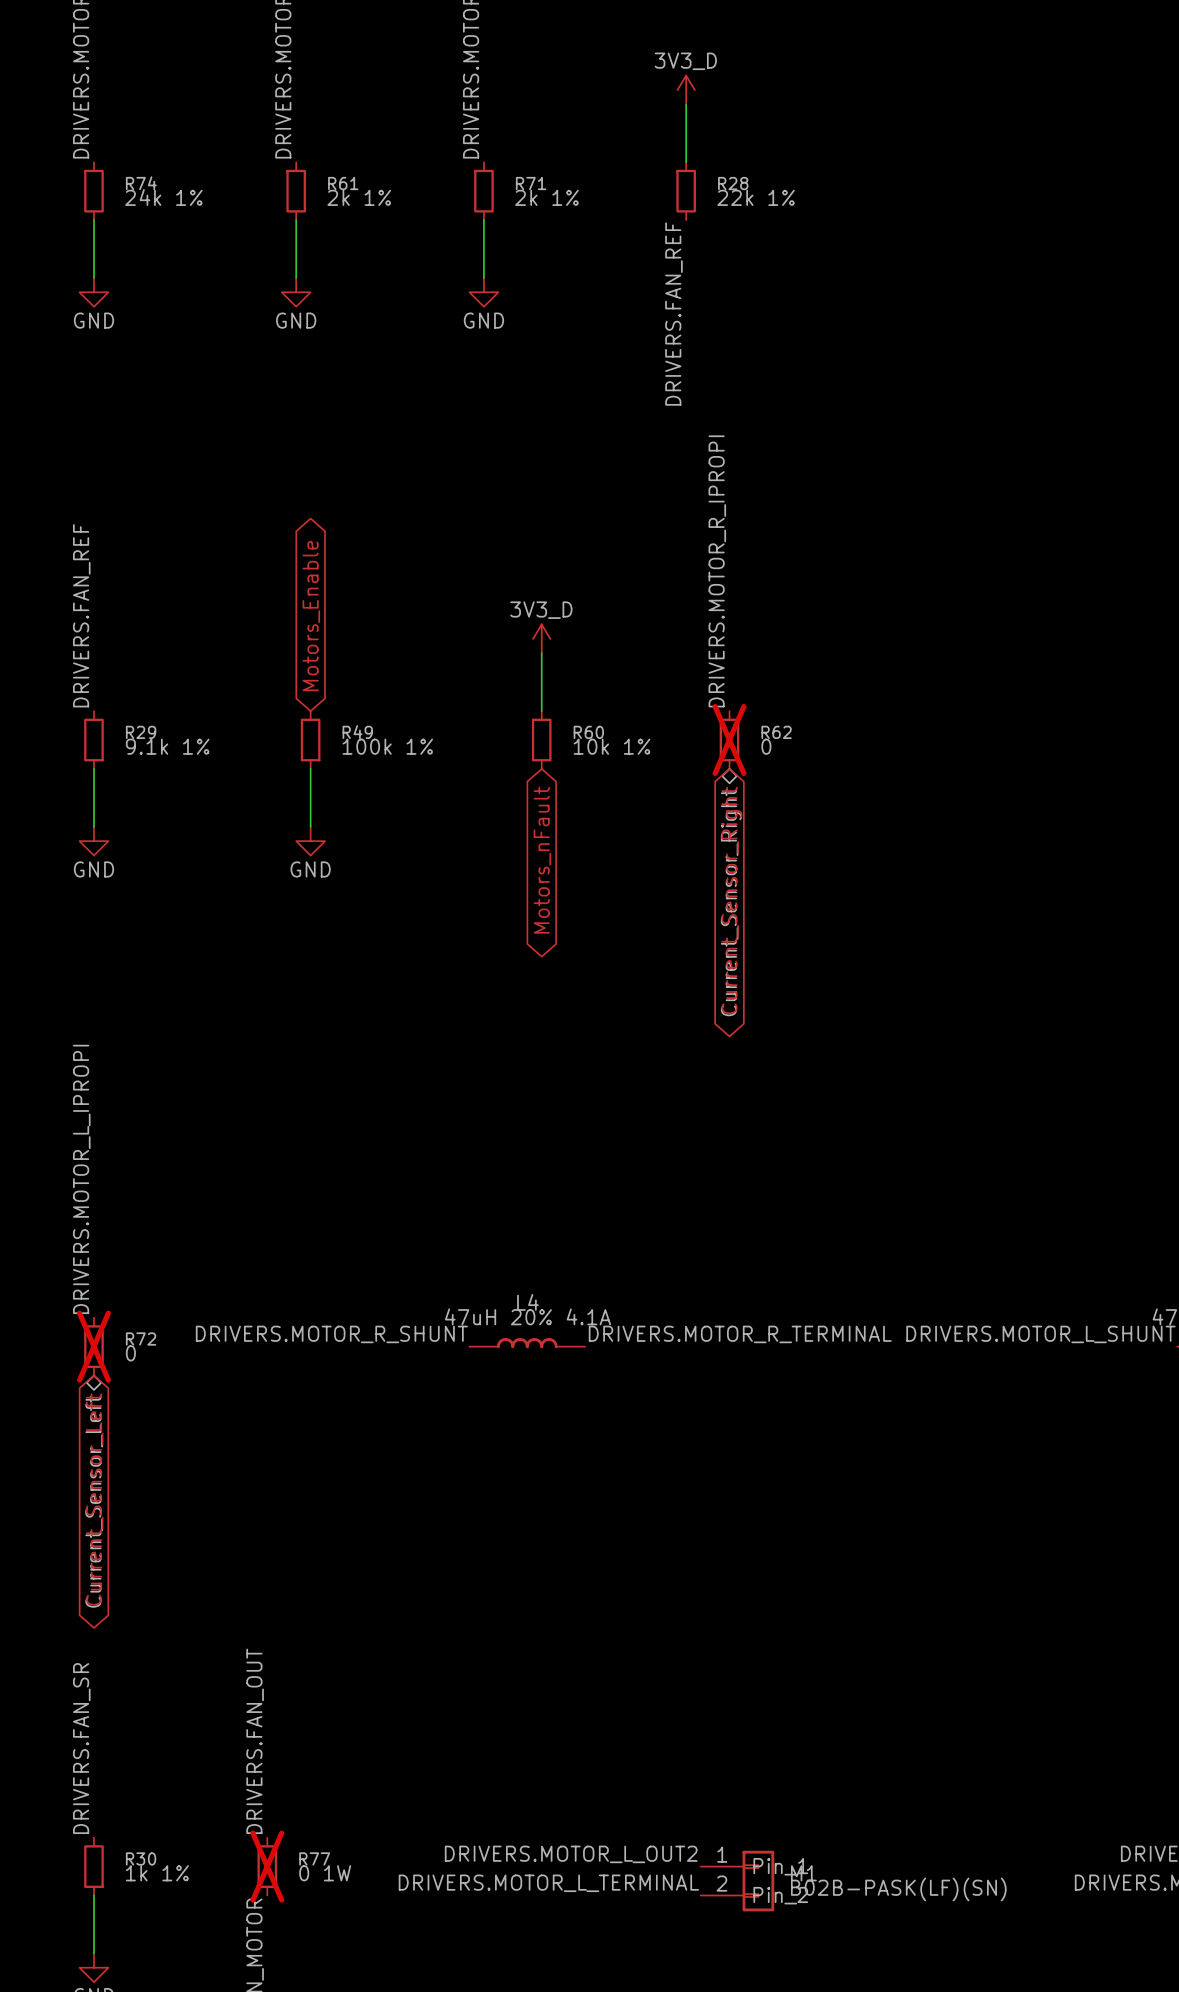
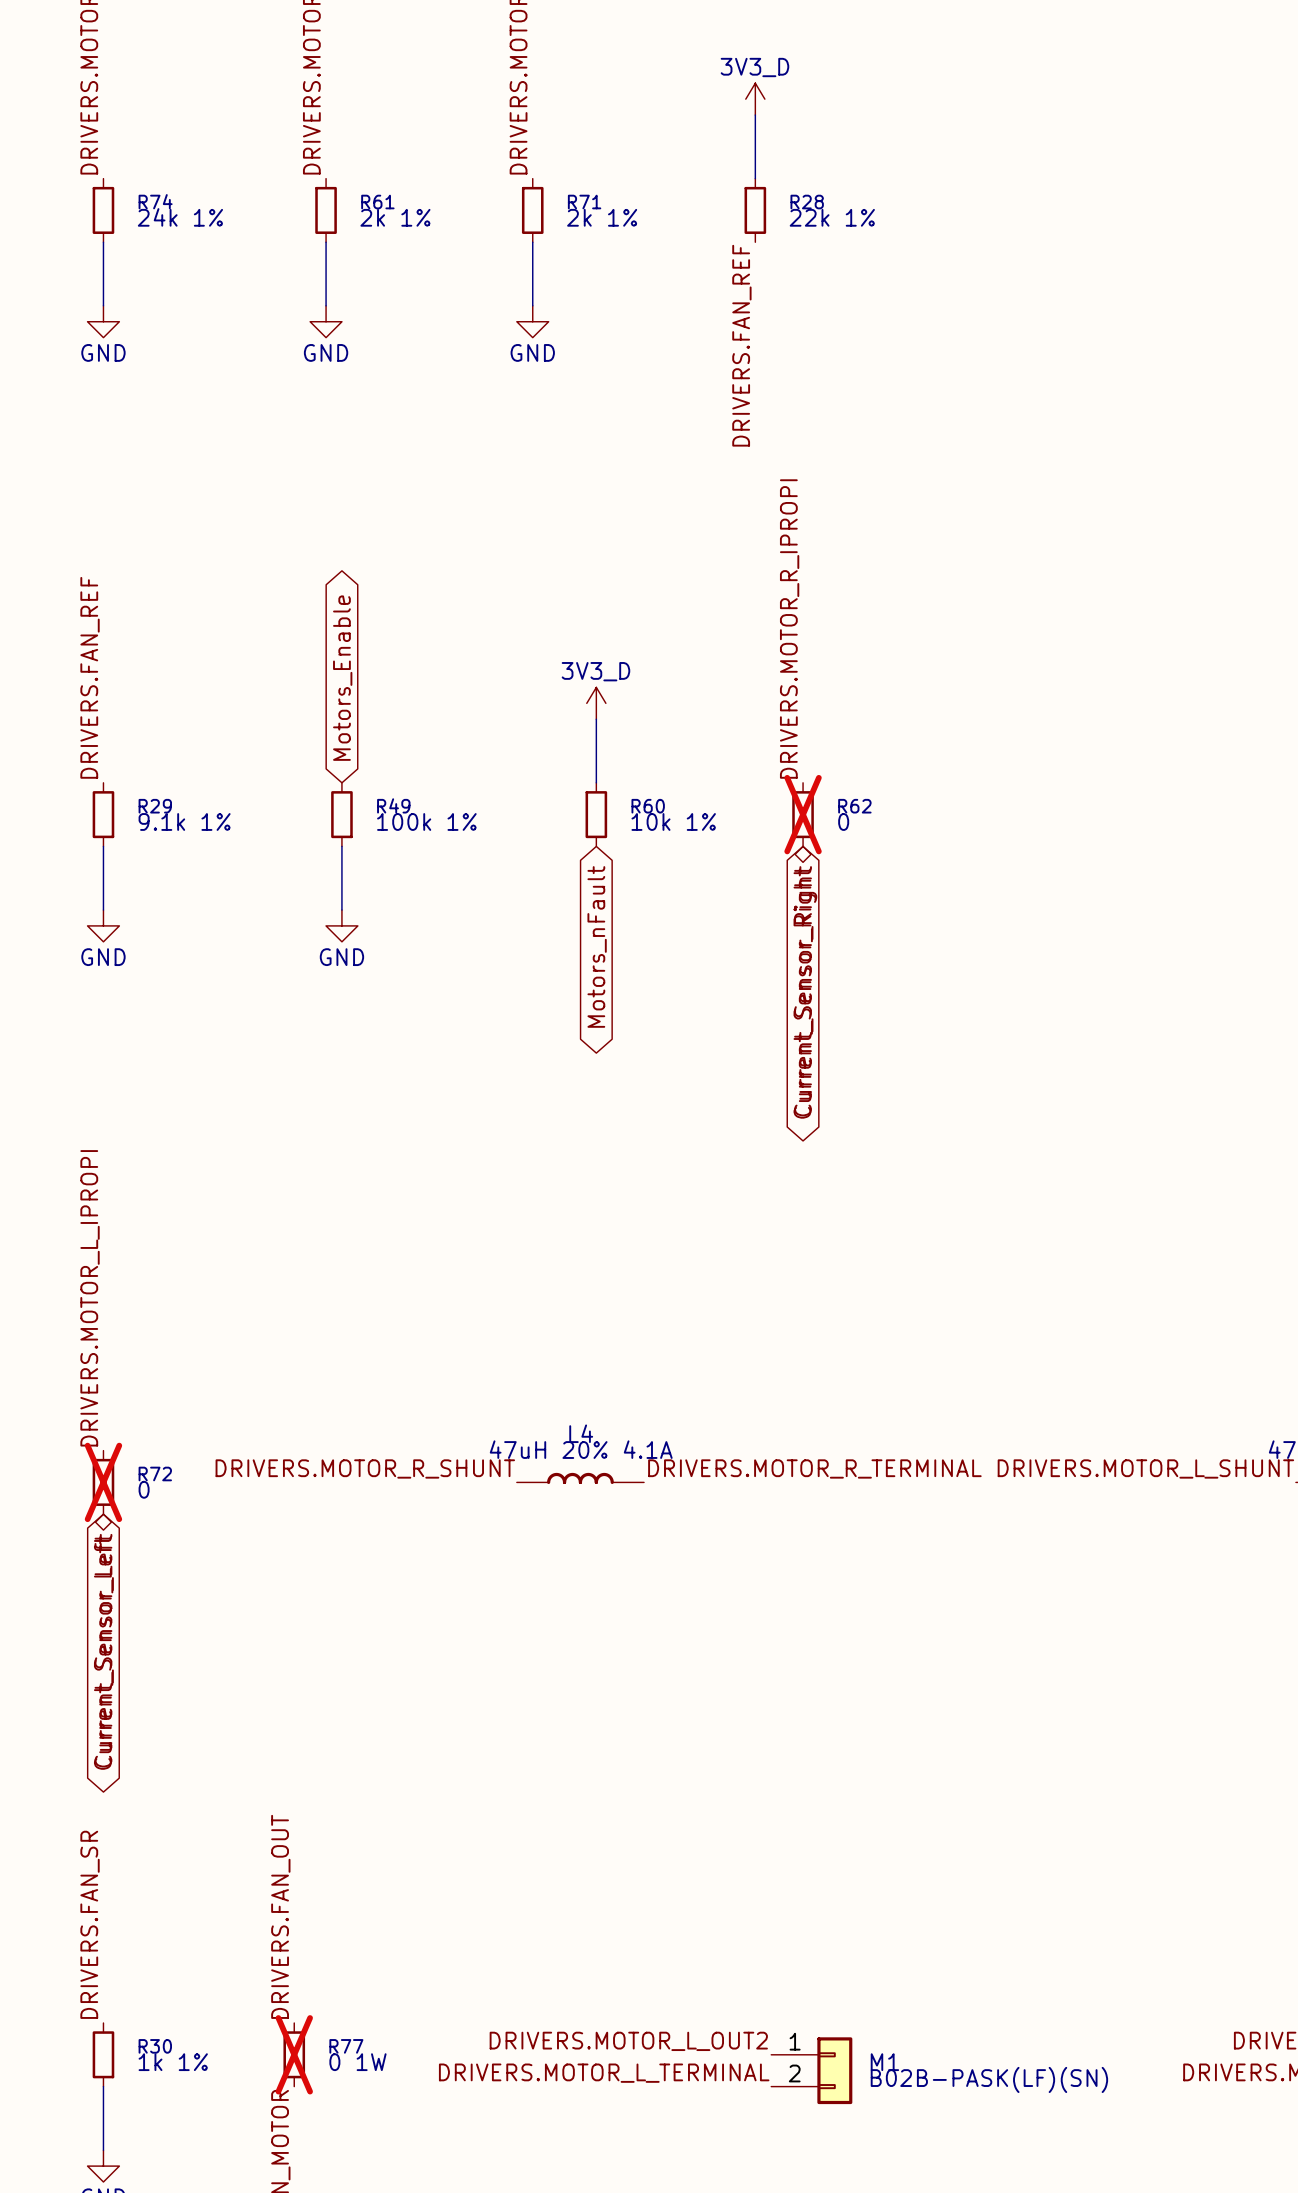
M1 pin name: Pin_1 (780, 1866) -> none
M1 pin name: Pin_2 (780, 1895) -> none

